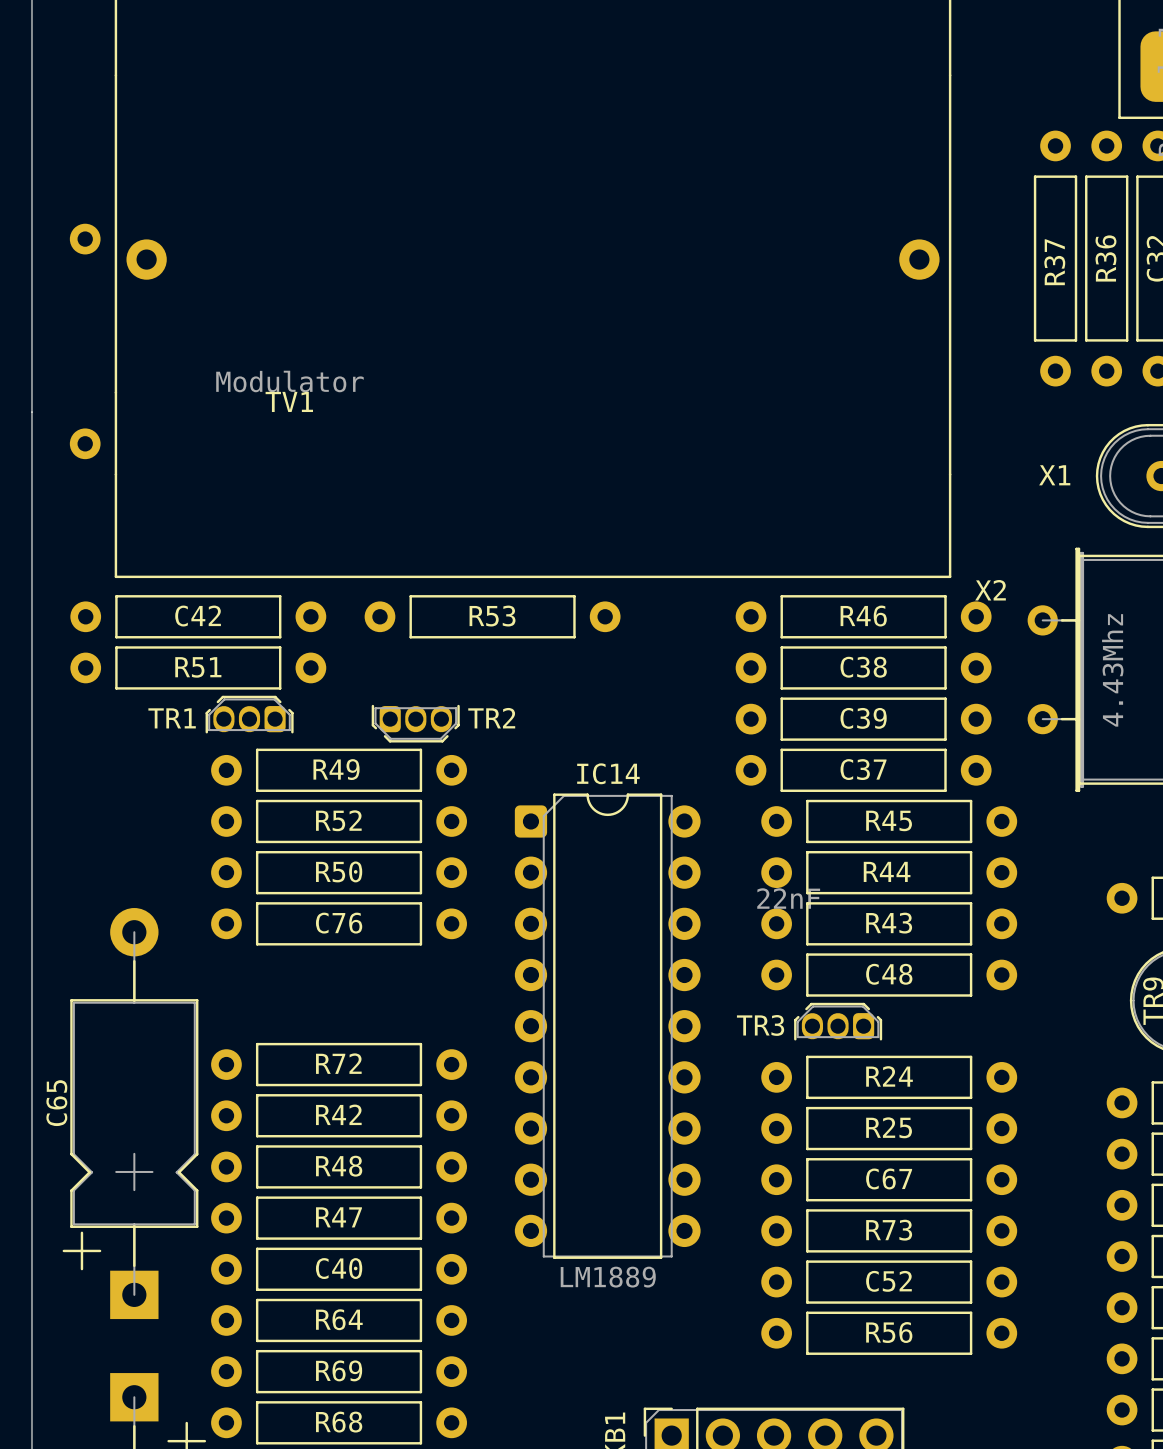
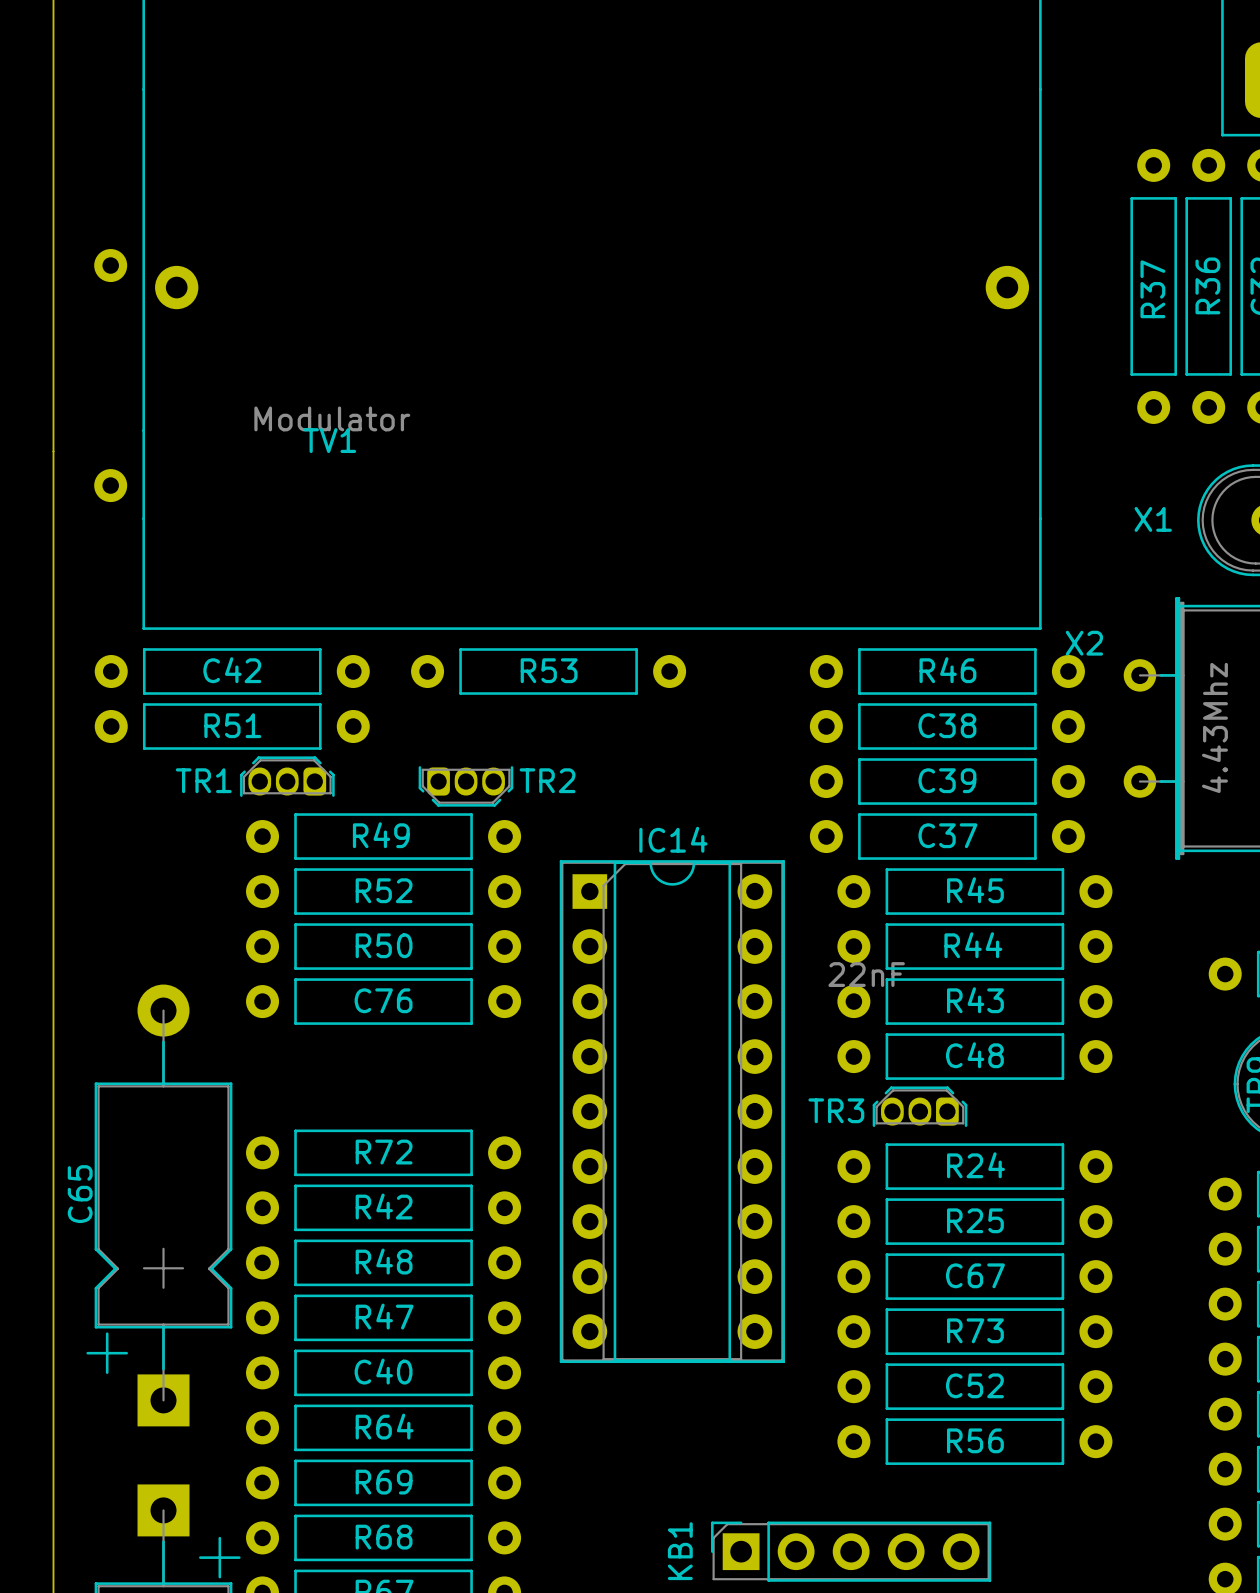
IC14 footprint: [514, 793, 701, 1259] -> [559, 860, 785, 1364]
IC14 value: LM1889 (608, 1277) -> none

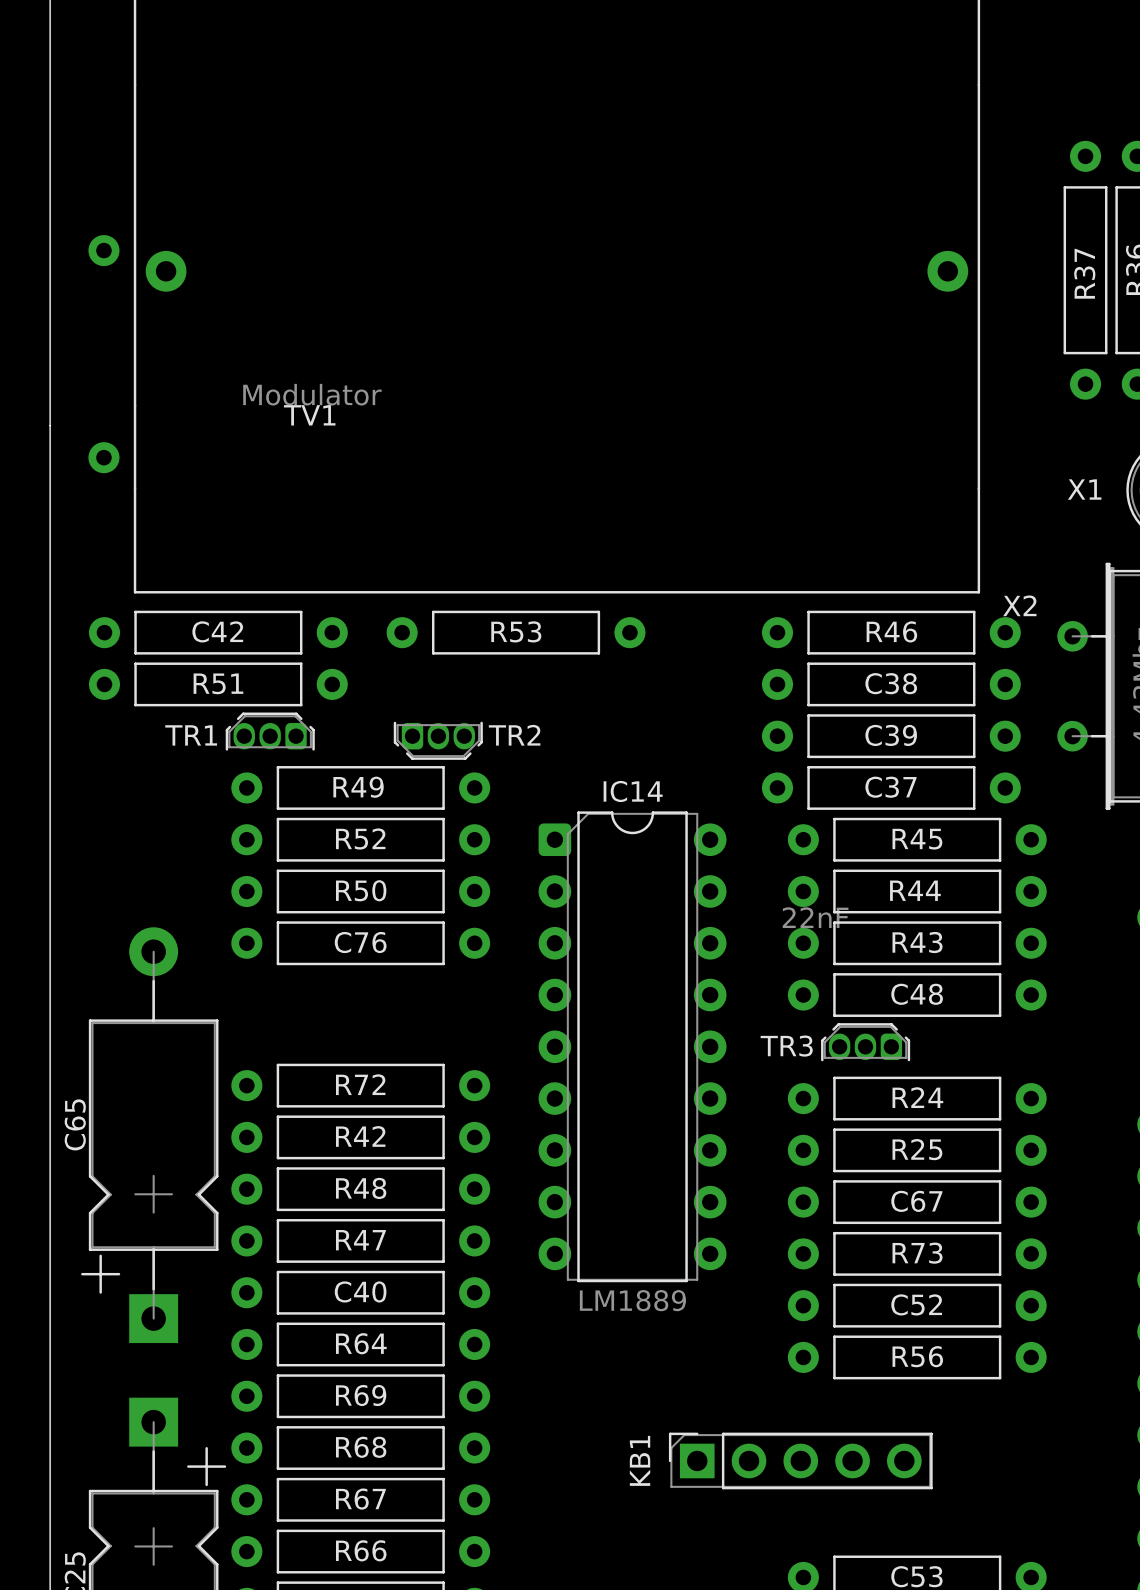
IC14 footprint: [559, 860, 785, 1364] -> [538, 811, 727, 1283]
IC14 value: none -> LM1889 (632, 1300)

